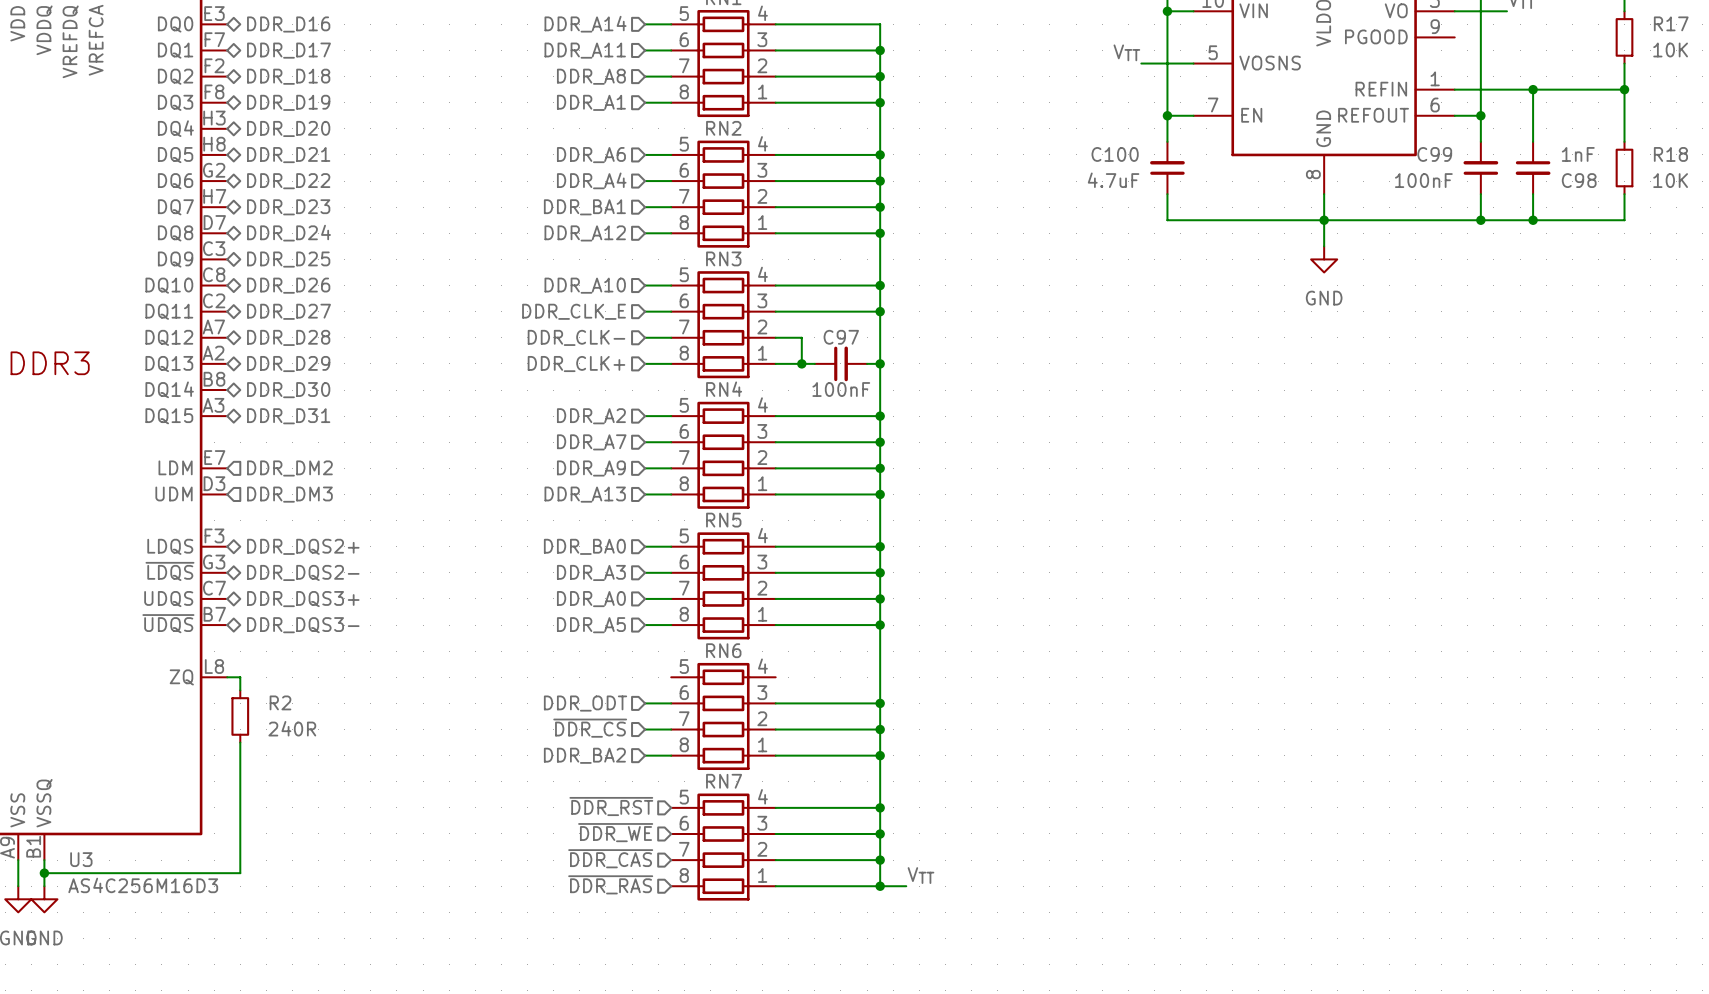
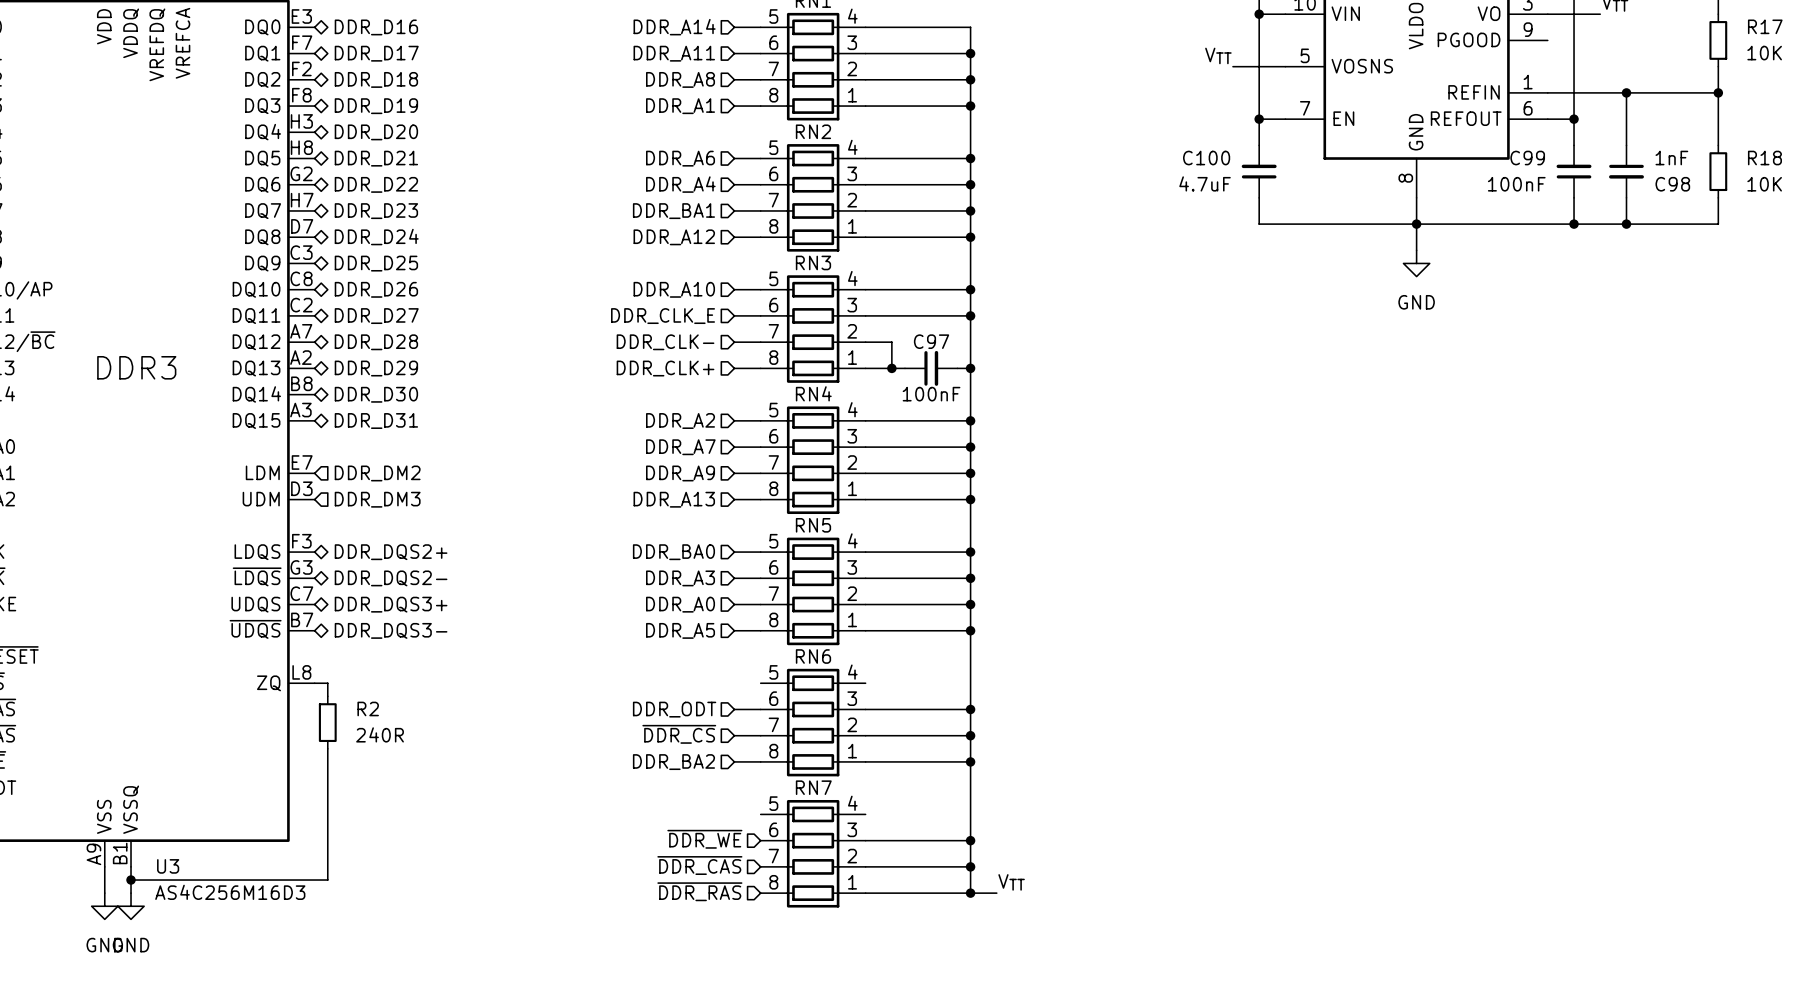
hierarchical label: ~{DDR_RST} (611, 806) -> none
wire: (775, 807) (880, 807) -> none
junction: (880, 807) -> none

